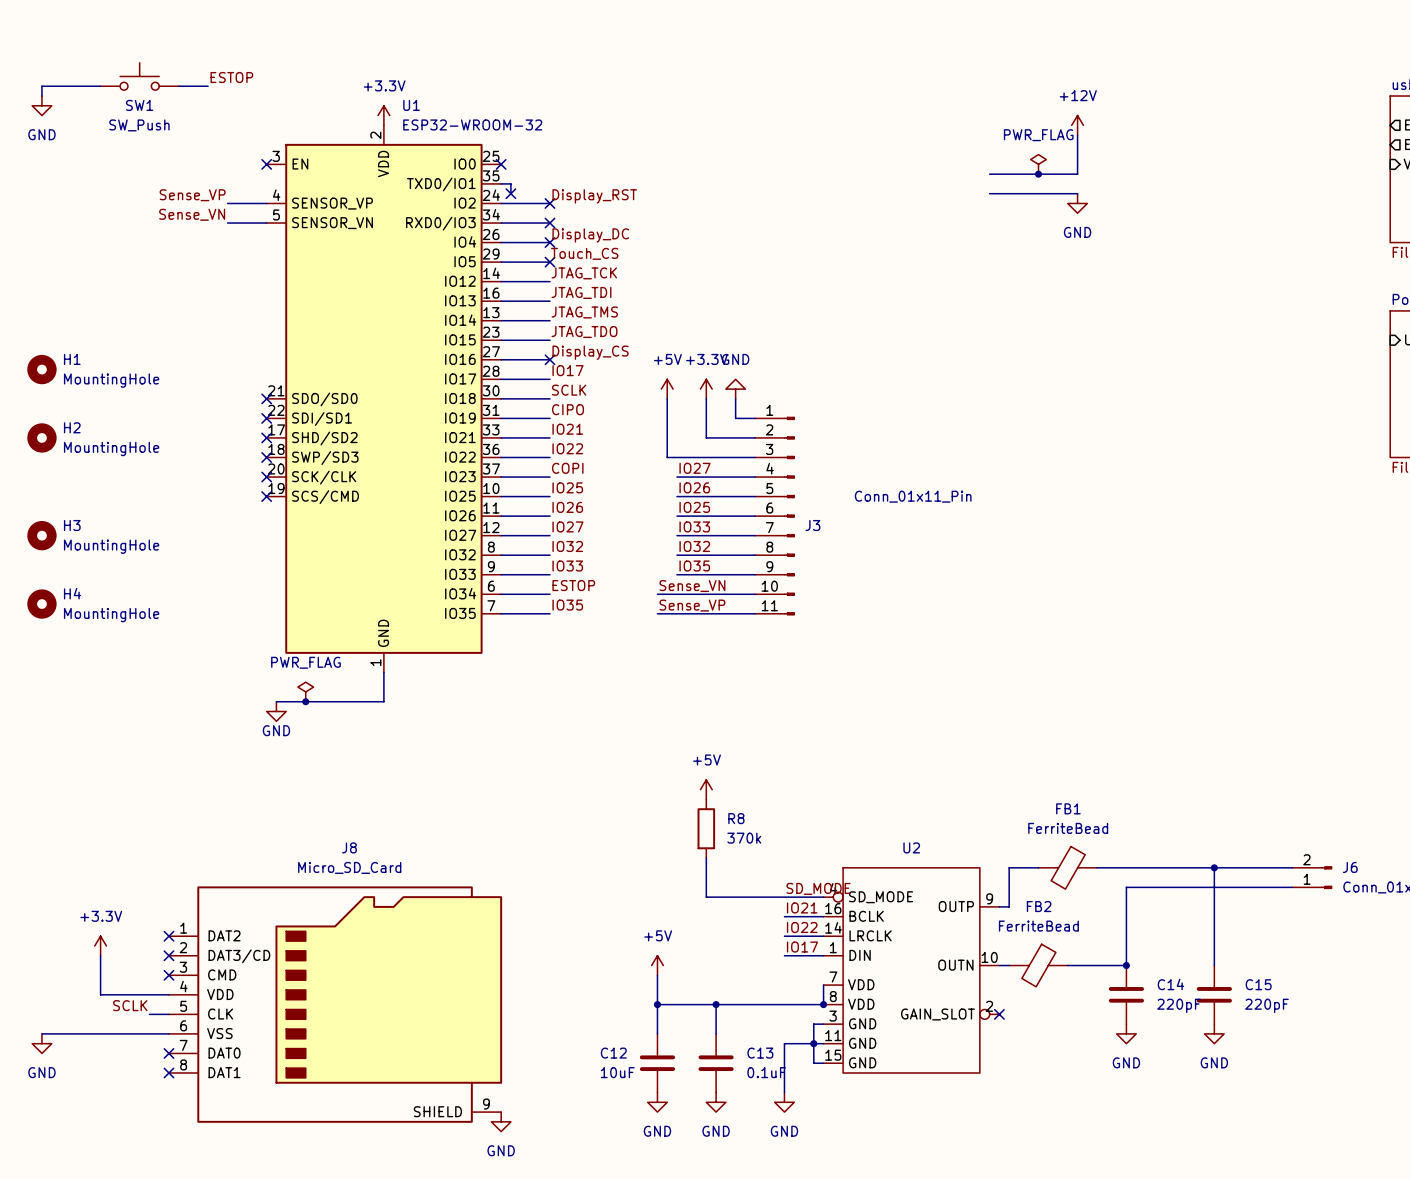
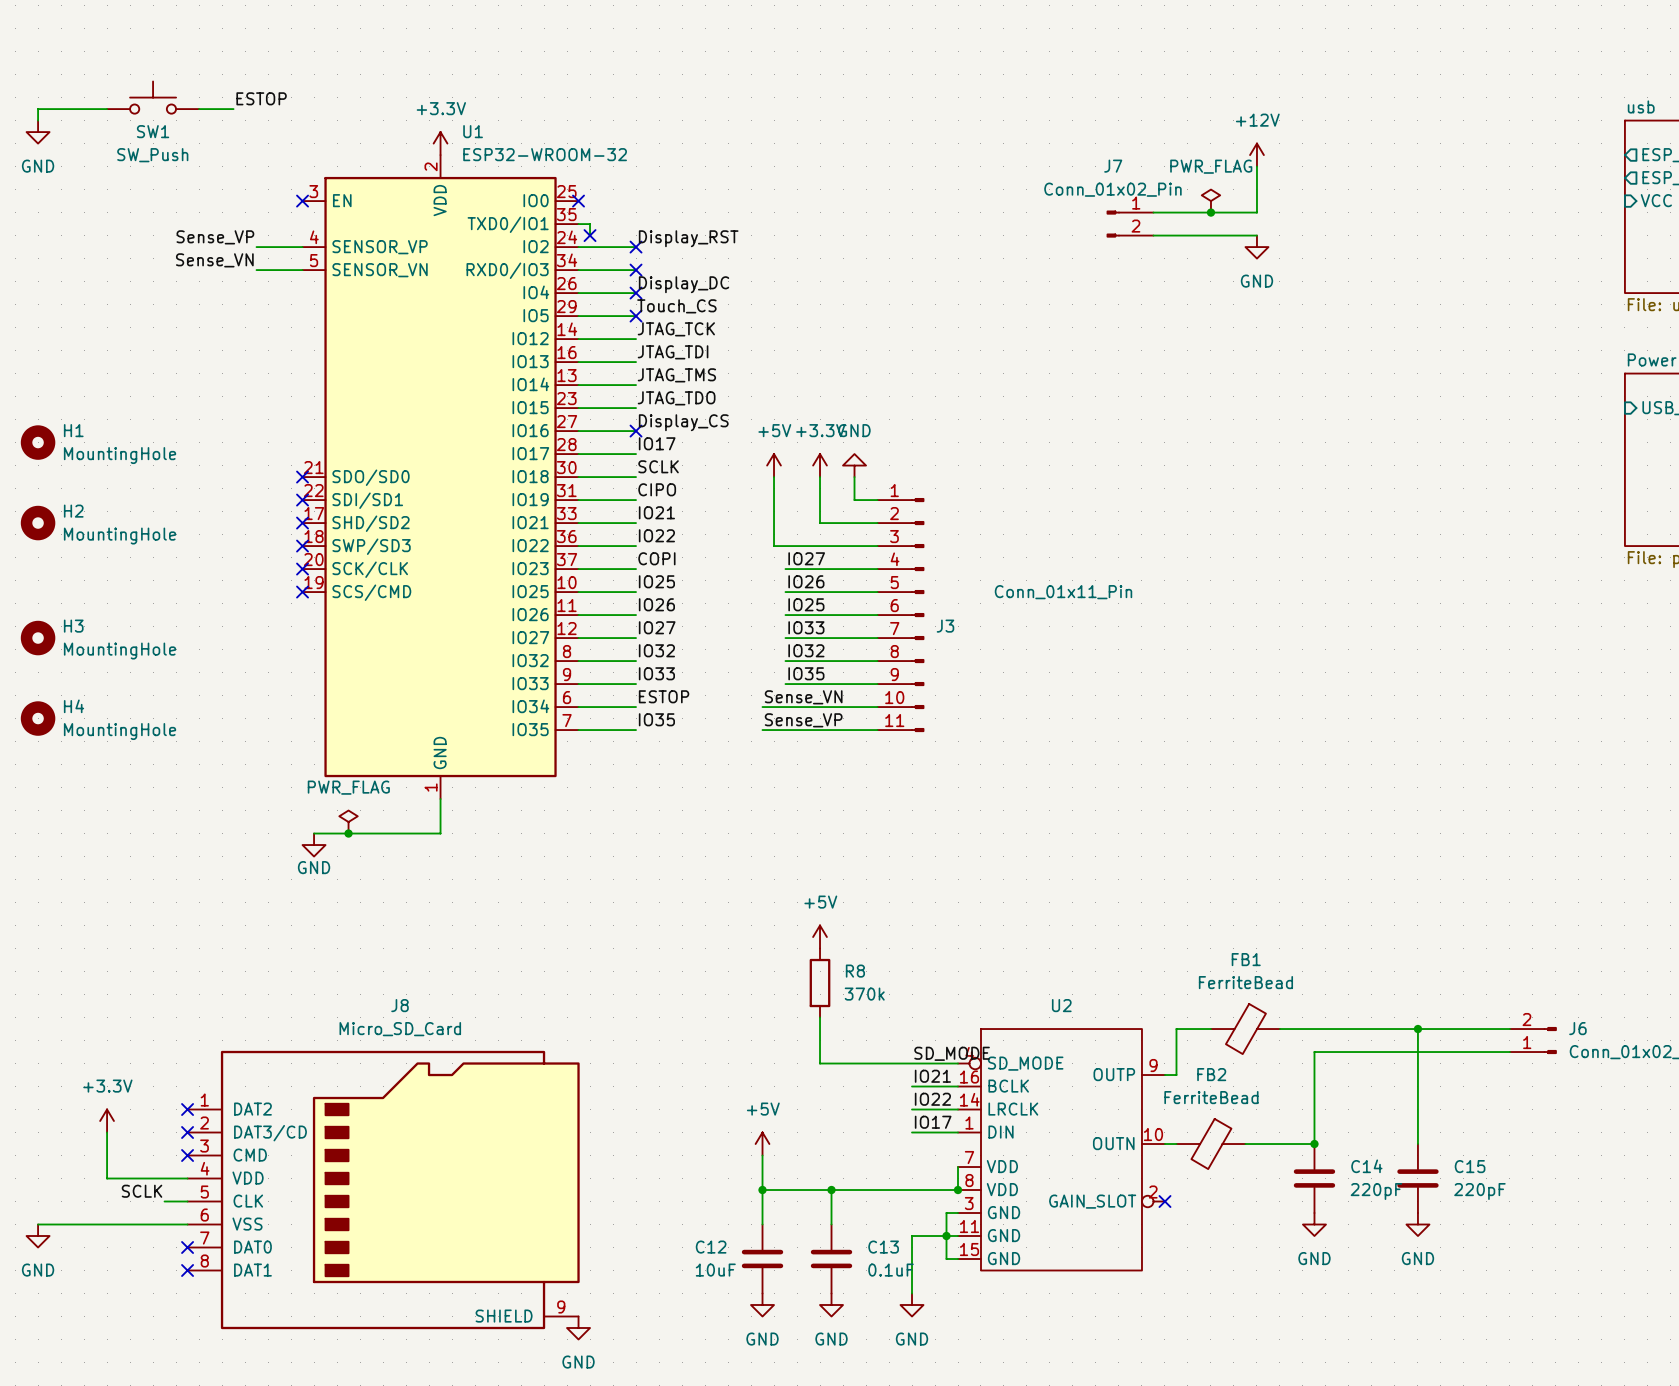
J7: none -> Conn_01x02_Pin (1130, 224)

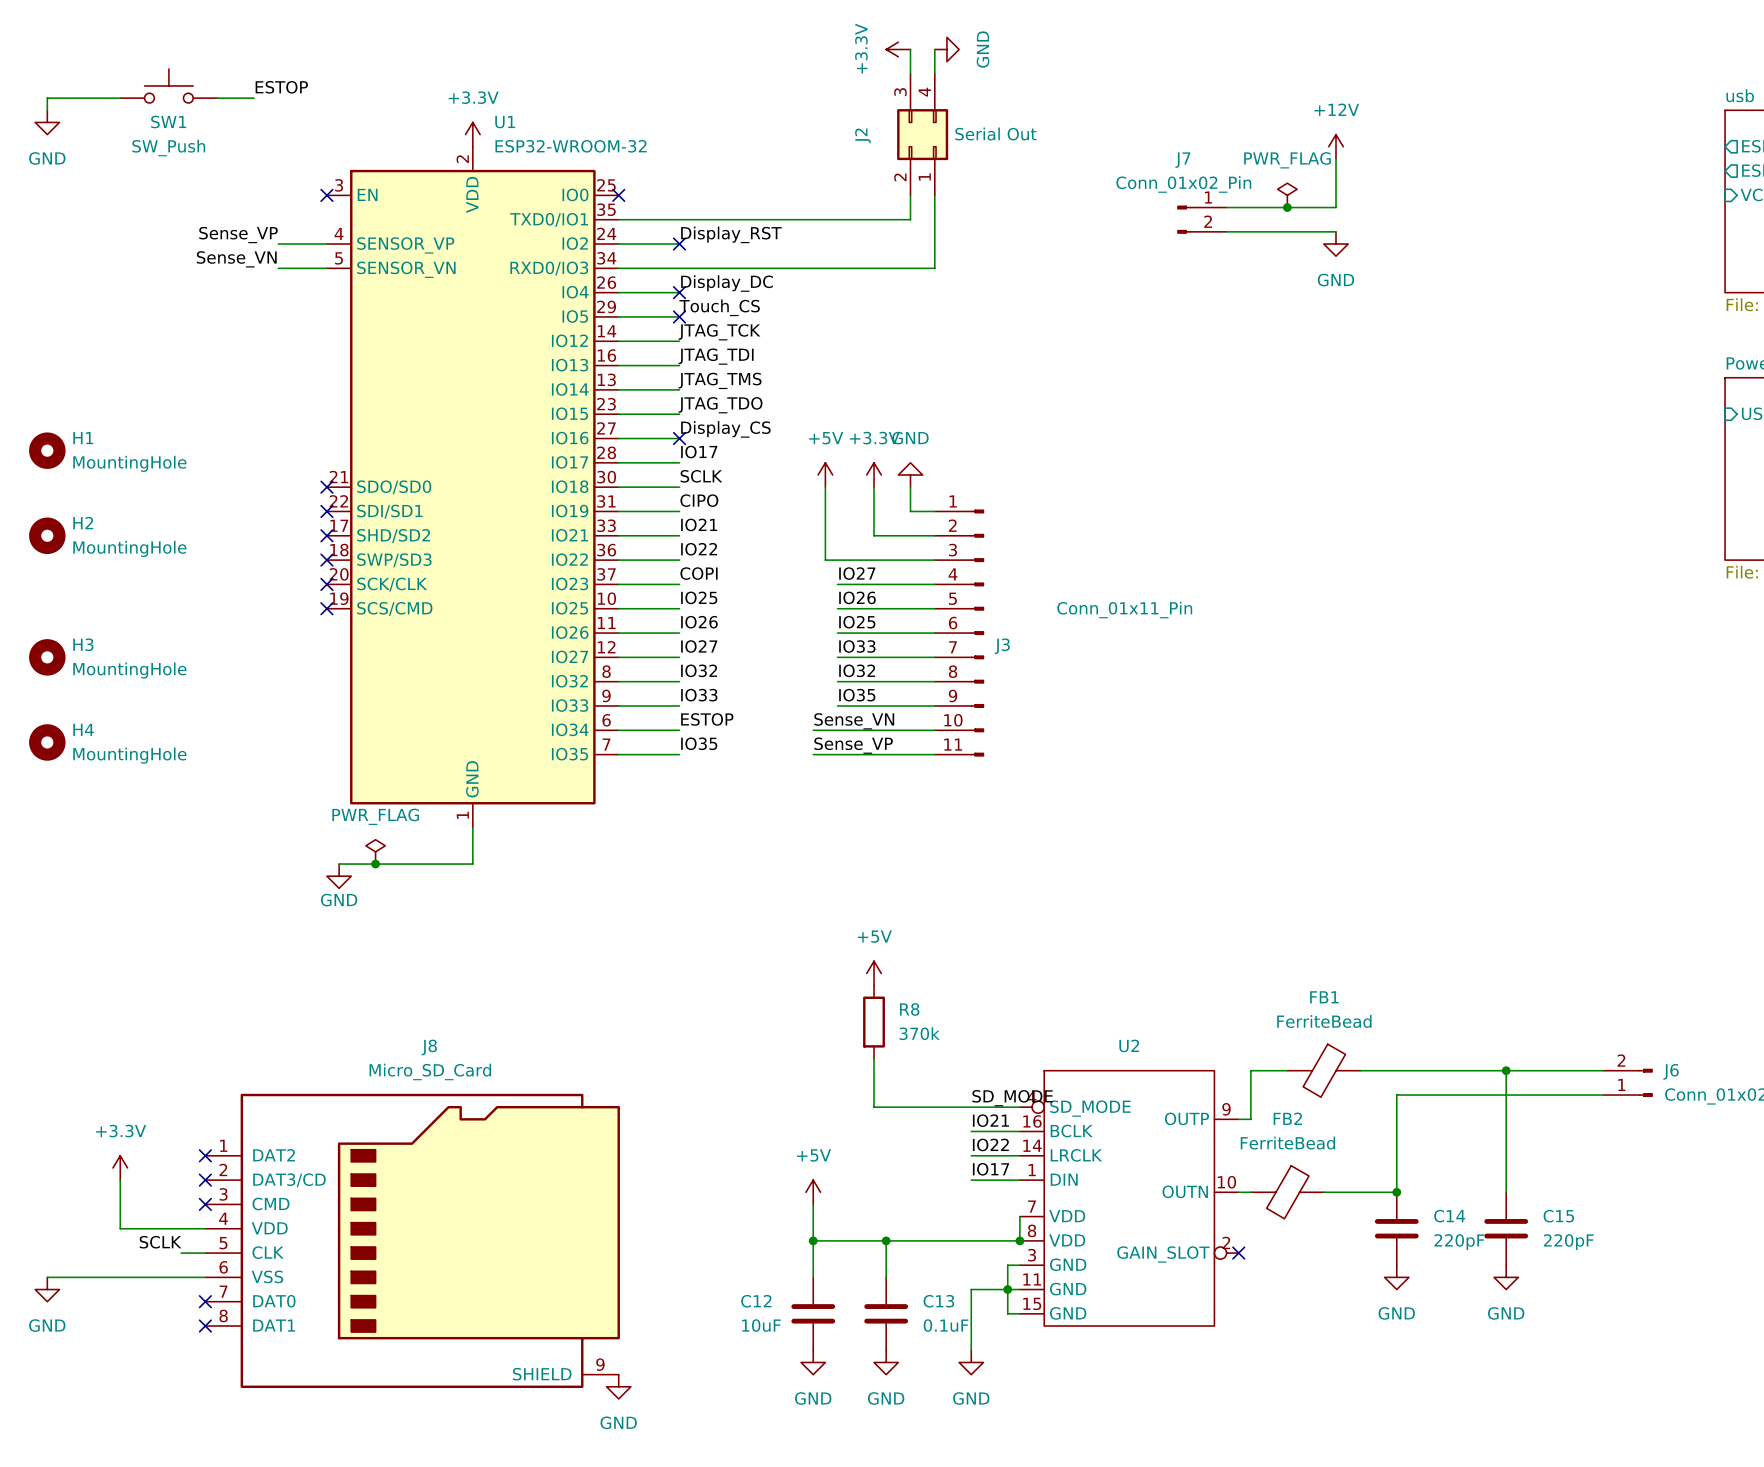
power symbol: none -> +3.3V (898, 49)
wire: none -> (910, 49) (910, 73)
wire: none -> (934, 49) (934, 73)
power symbol: none -> GND (946, 49)
J2: none -> Serial Out (922, 134)
wire: none -> (934, 195) (934, 268) (679, 268)
wire: (590, 224) (590, 235) -> (630, 219) (910, 219) (910, 195)
no-connect mark: (590, 235) -> none
no-connect mark: (636, 270) -> none

